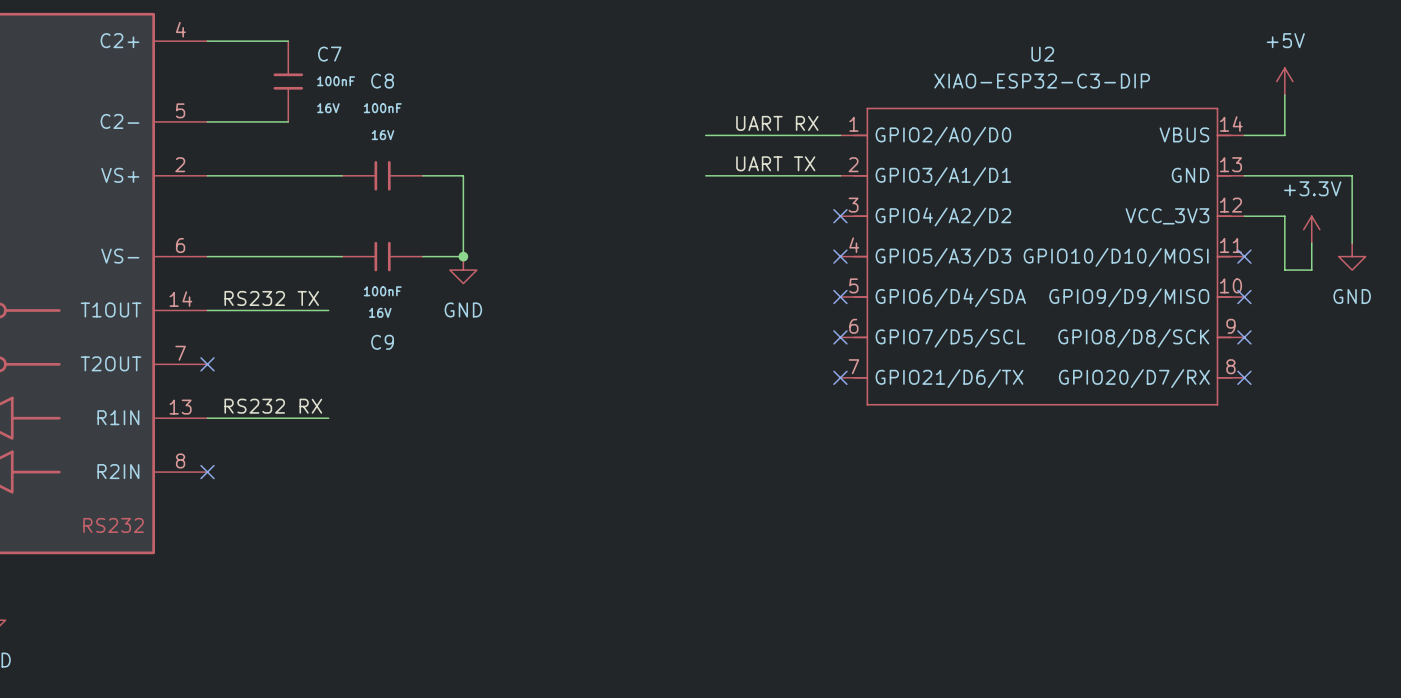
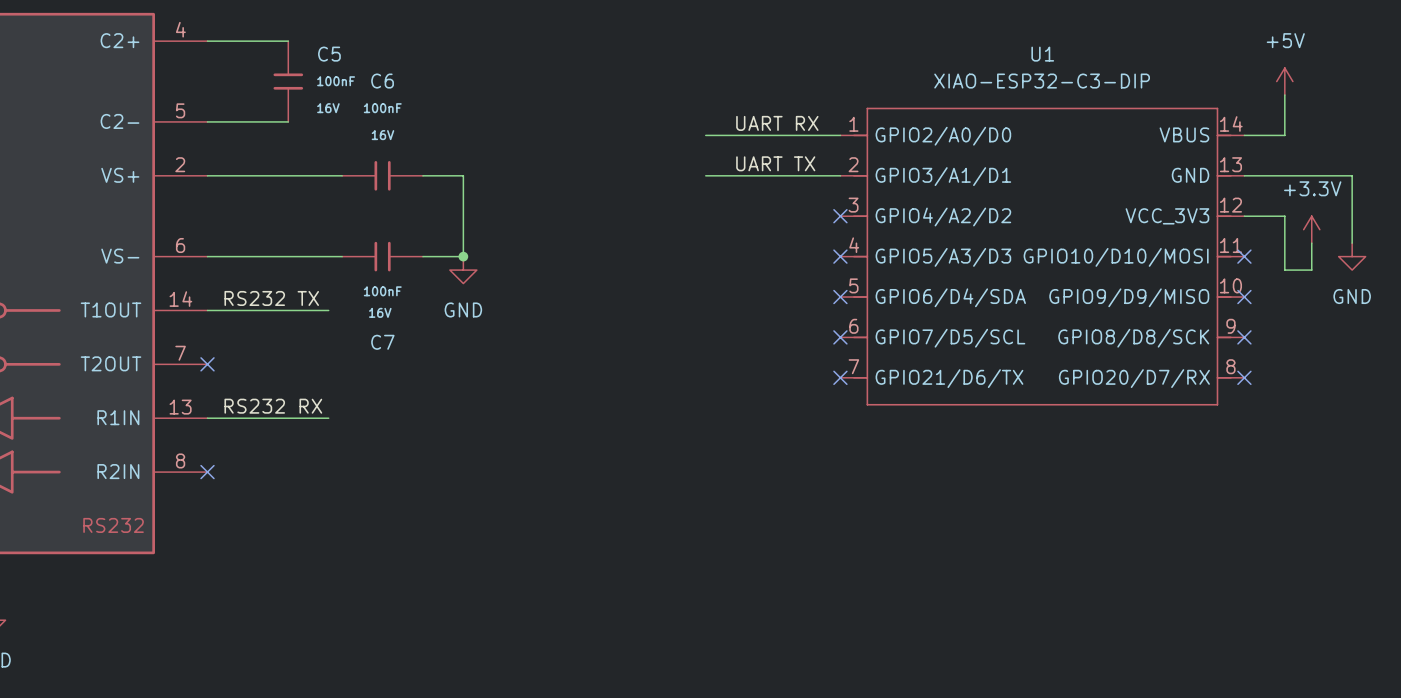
C7 name: C7 (329, 54) -> C5 (329, 54)
U2 name: U2 (1042, 54) -> U1 (1042, 54)
C8 name: C8 (382, 81) -> C6 (382, 81)
C9 name: C9 (382, 342) -> C7 (382, 342)

